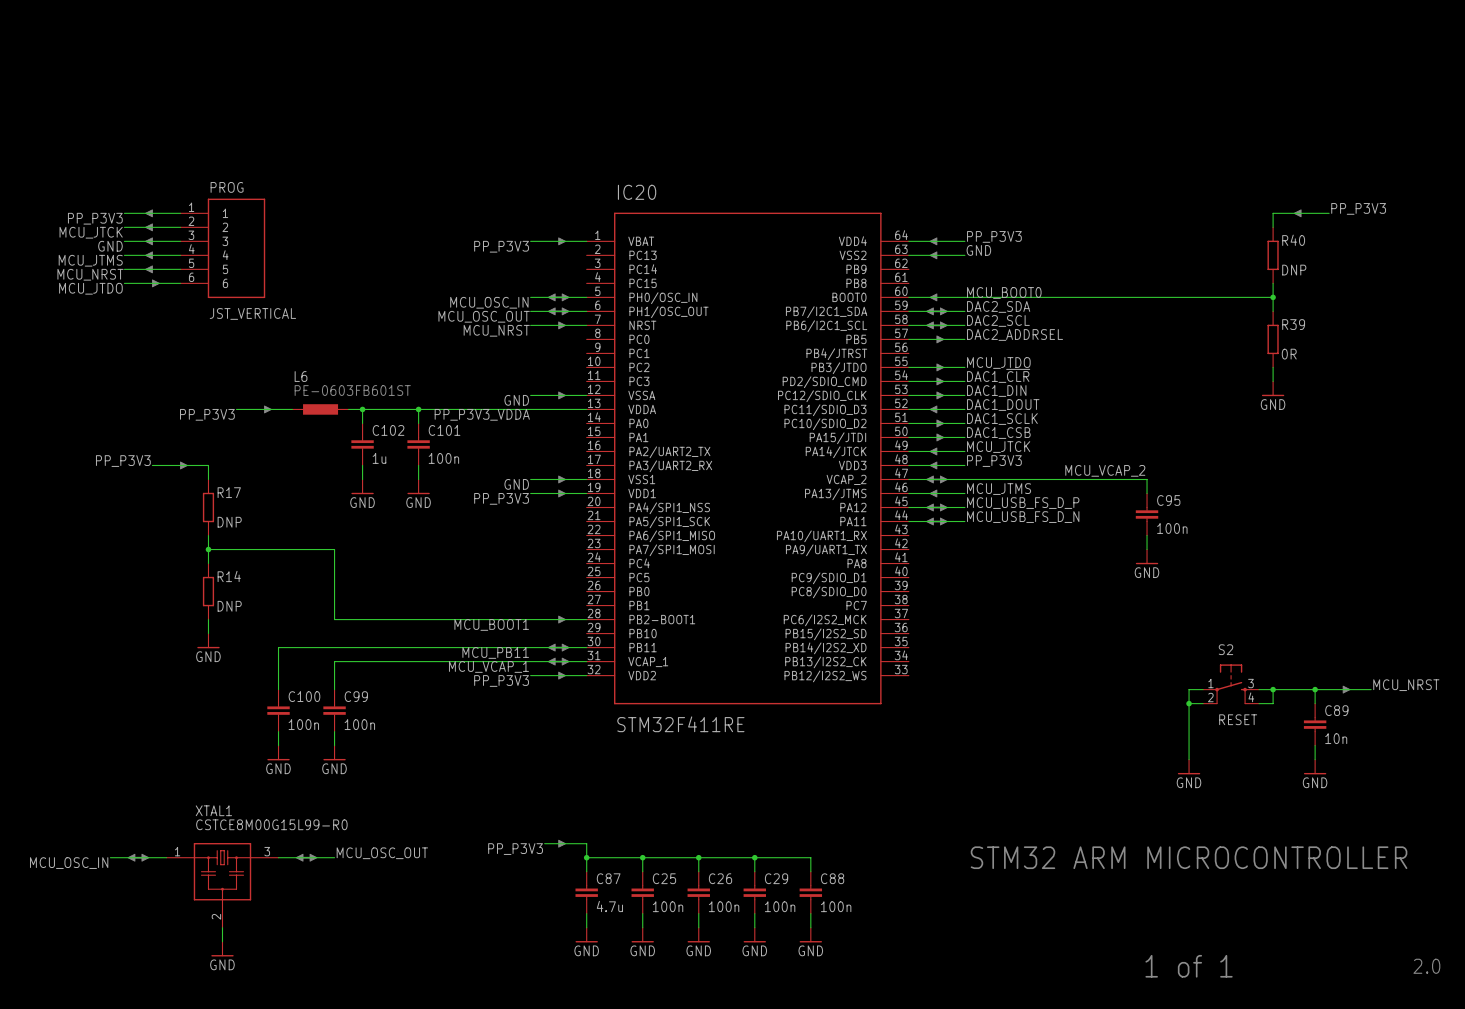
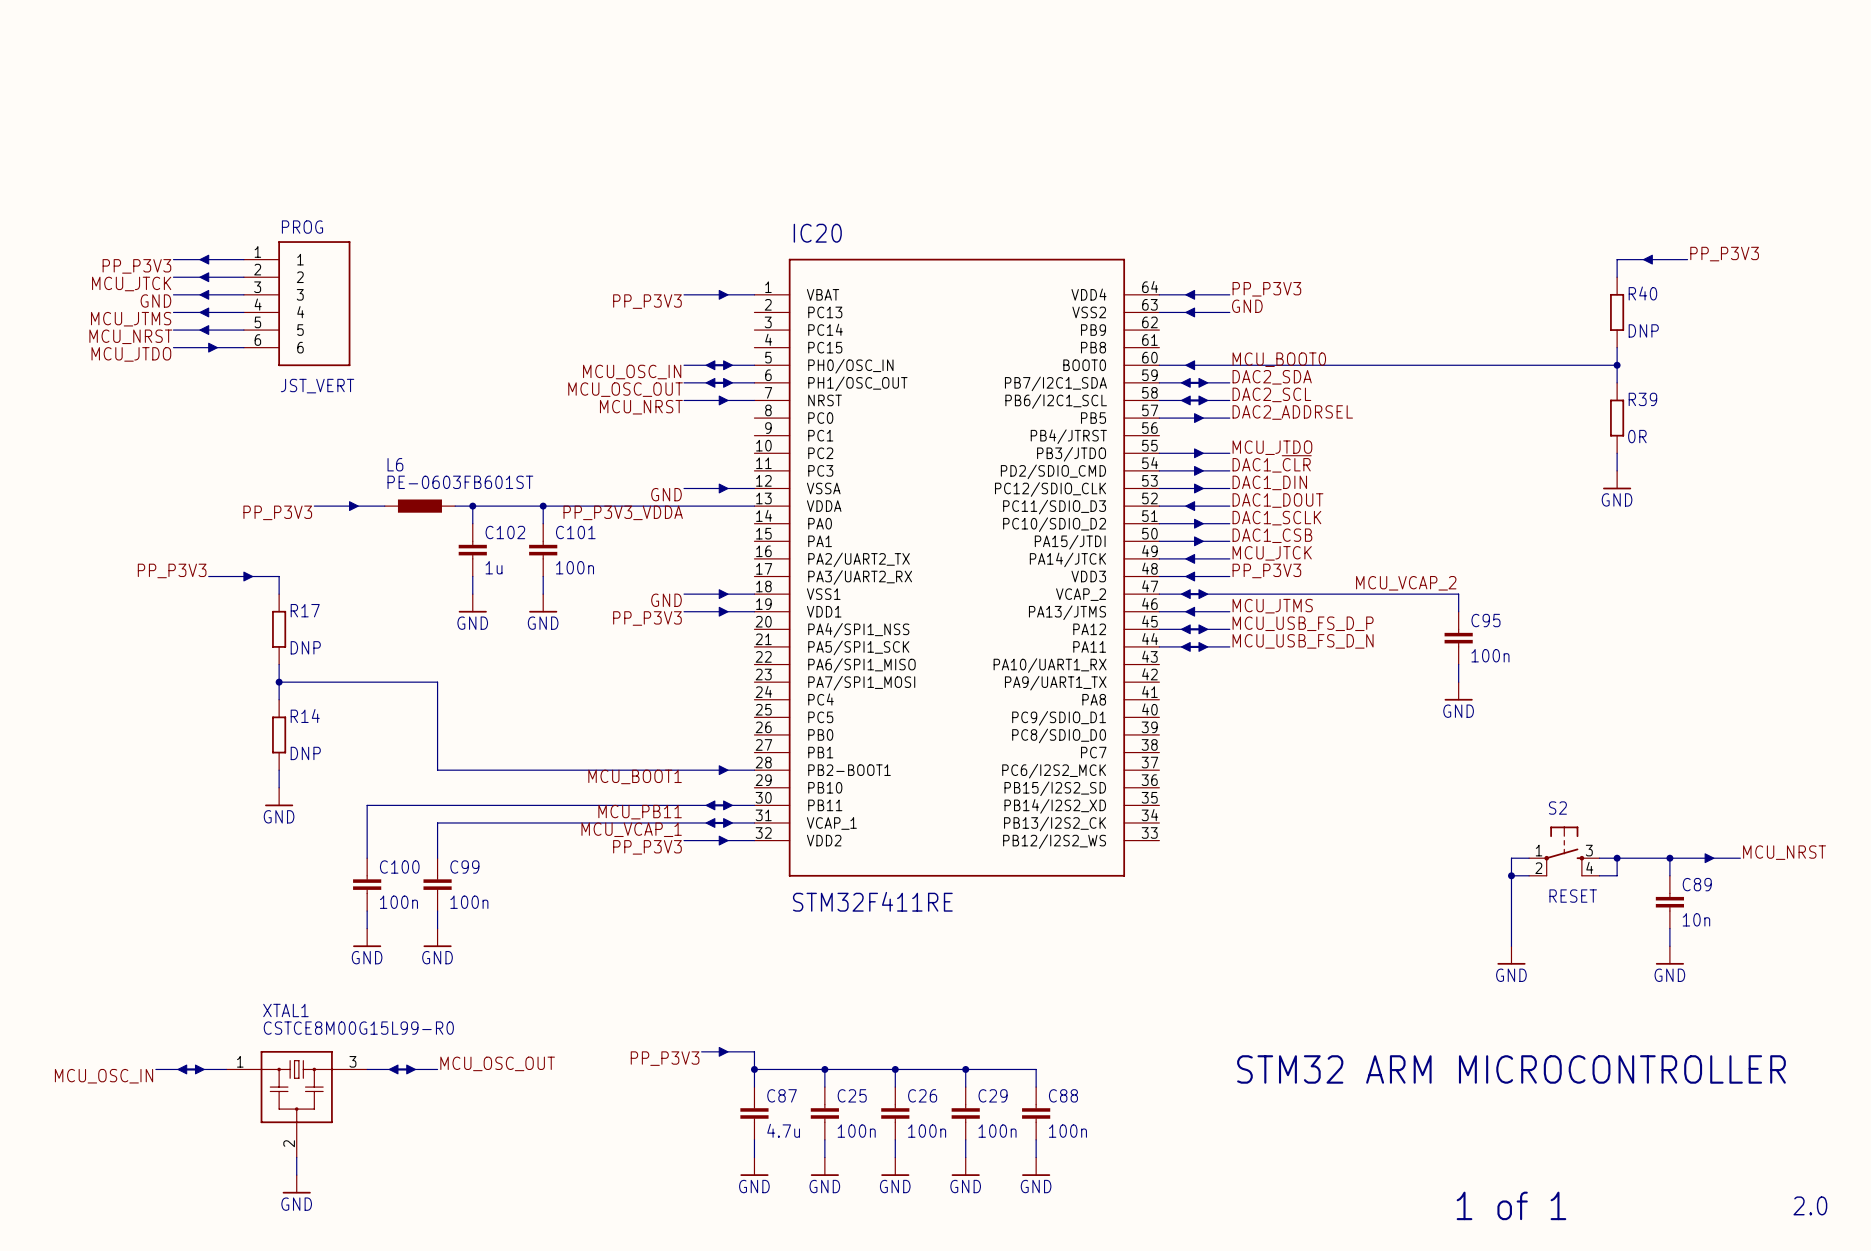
PROG value: JST_VERTICAL (252, 313) -> JST_VERT (317, 386)

